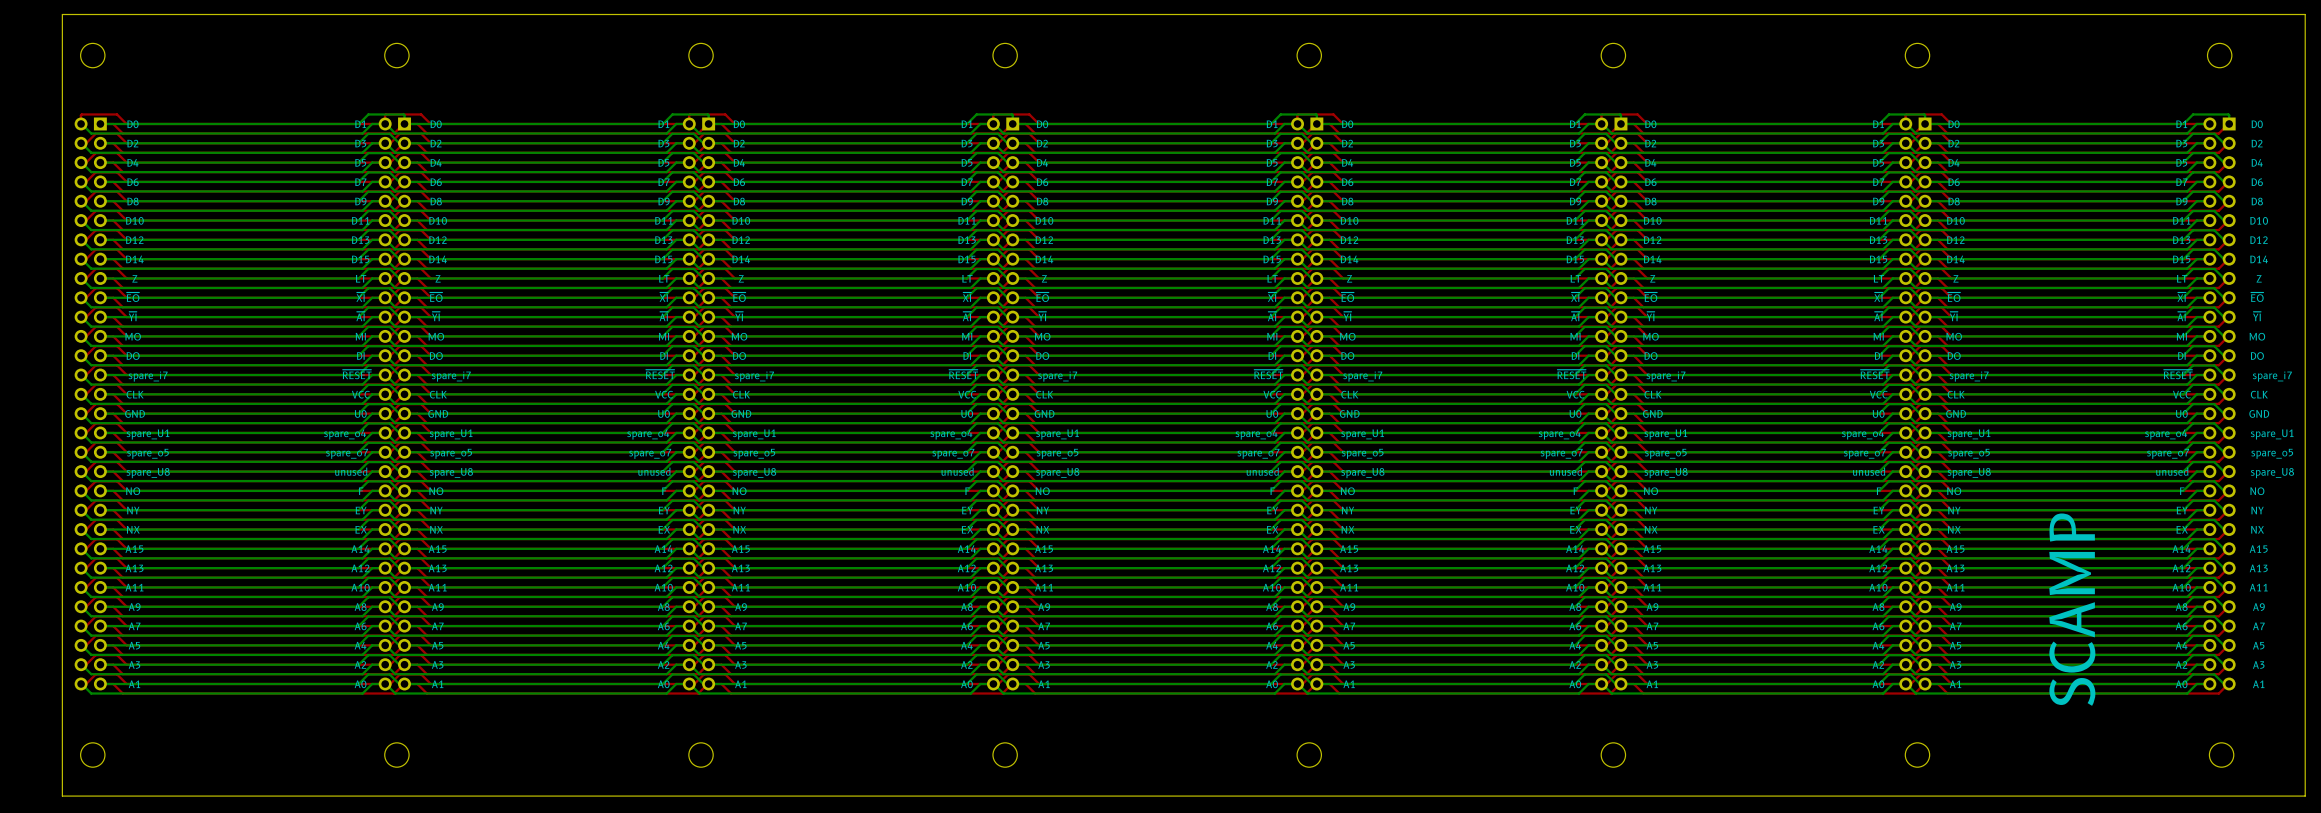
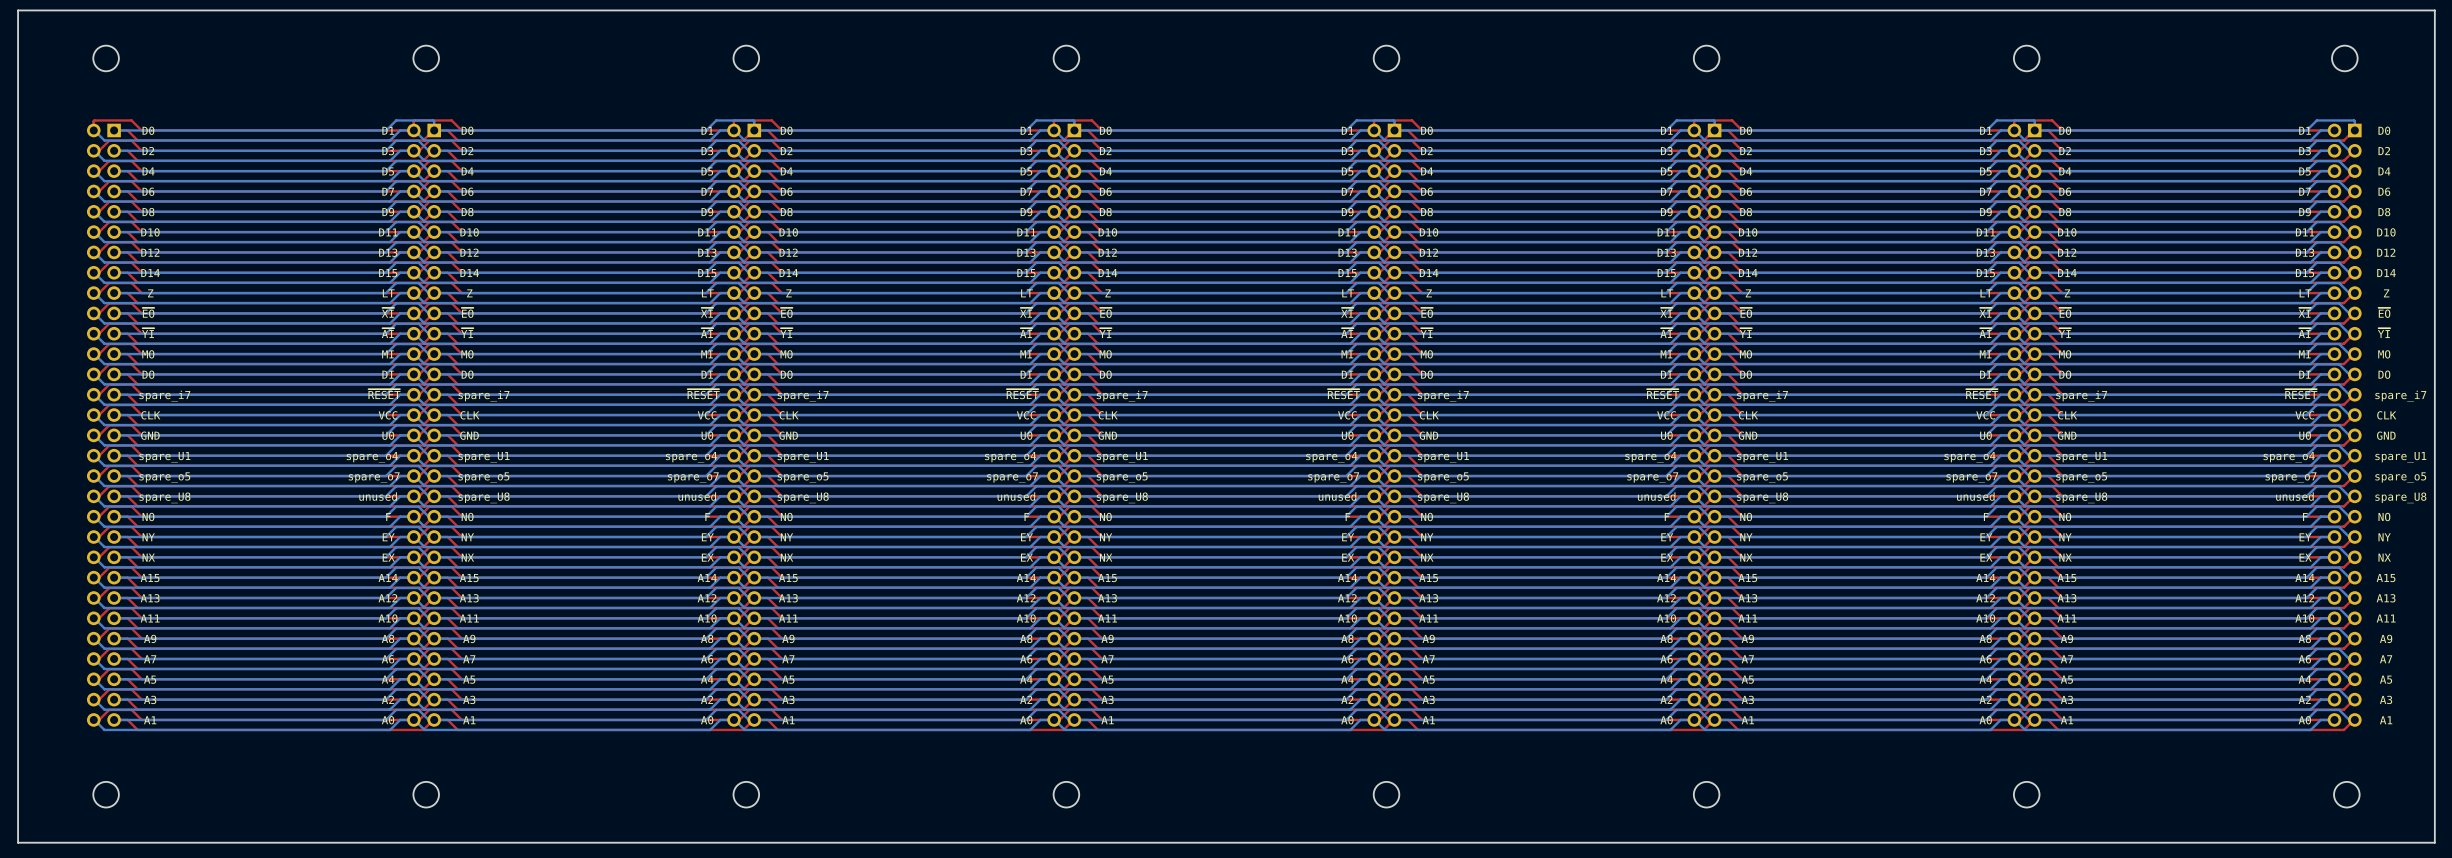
board edge: (2305, 14) (62, 14) (62, 796) (2305, 796) -> (2434, 15) (2434, 10) (18, 10) (18, 842) (2434, 842) (2434, 837)
text: SCAMP (2072, 609) -> none

